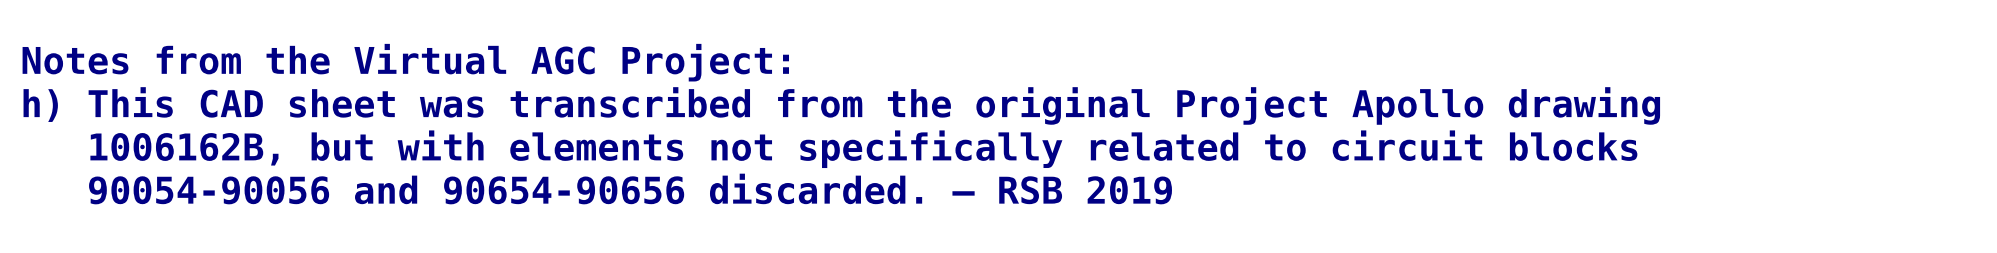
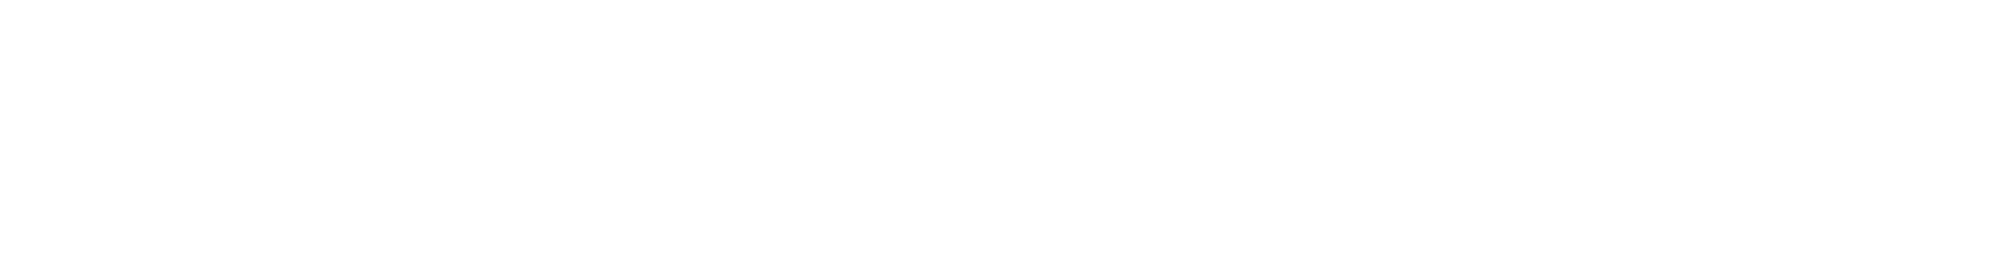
text: Notes from the Virtual AGC Project: (405, 62) -> none
text: h) This CAD sheet was transcribed from the original Project Apollo drawing (841, 105) -> none
text: 1006162B, but with elements not specifically related to circuit blocks (863, 149) -> none
text: 90054-90056 and 90654-90656 discarded. — RSB 2019 (630, 189) -> none

